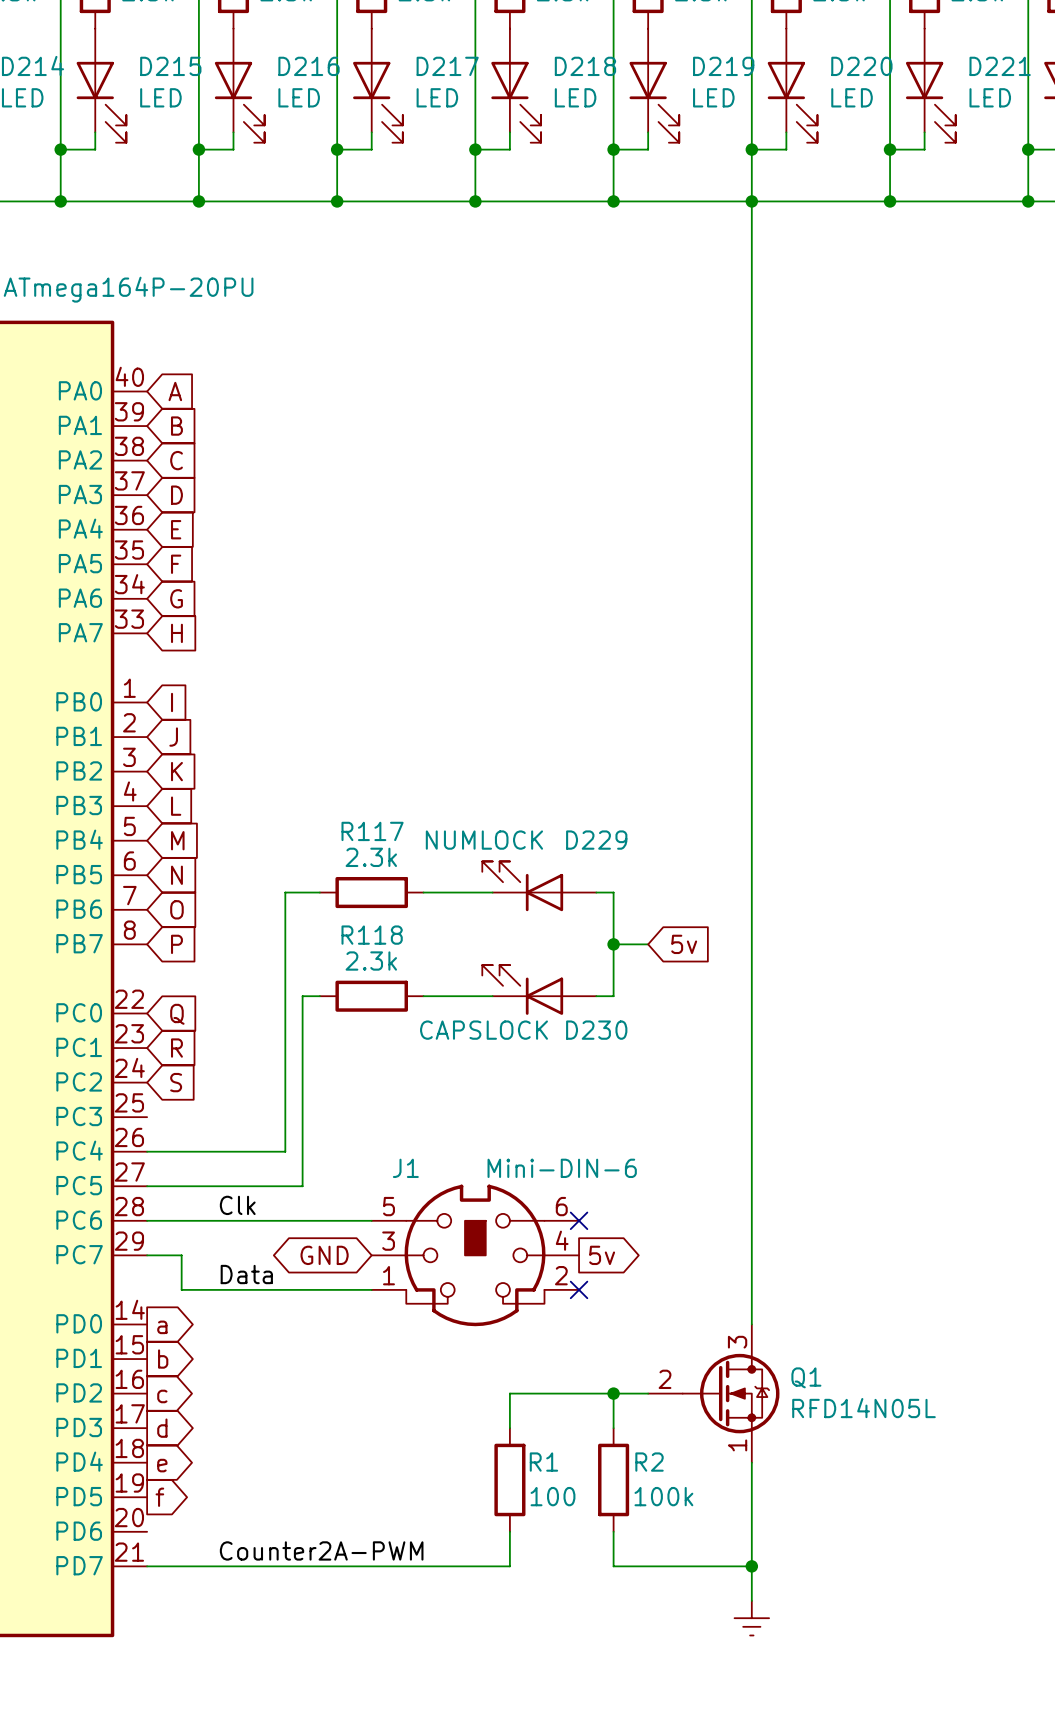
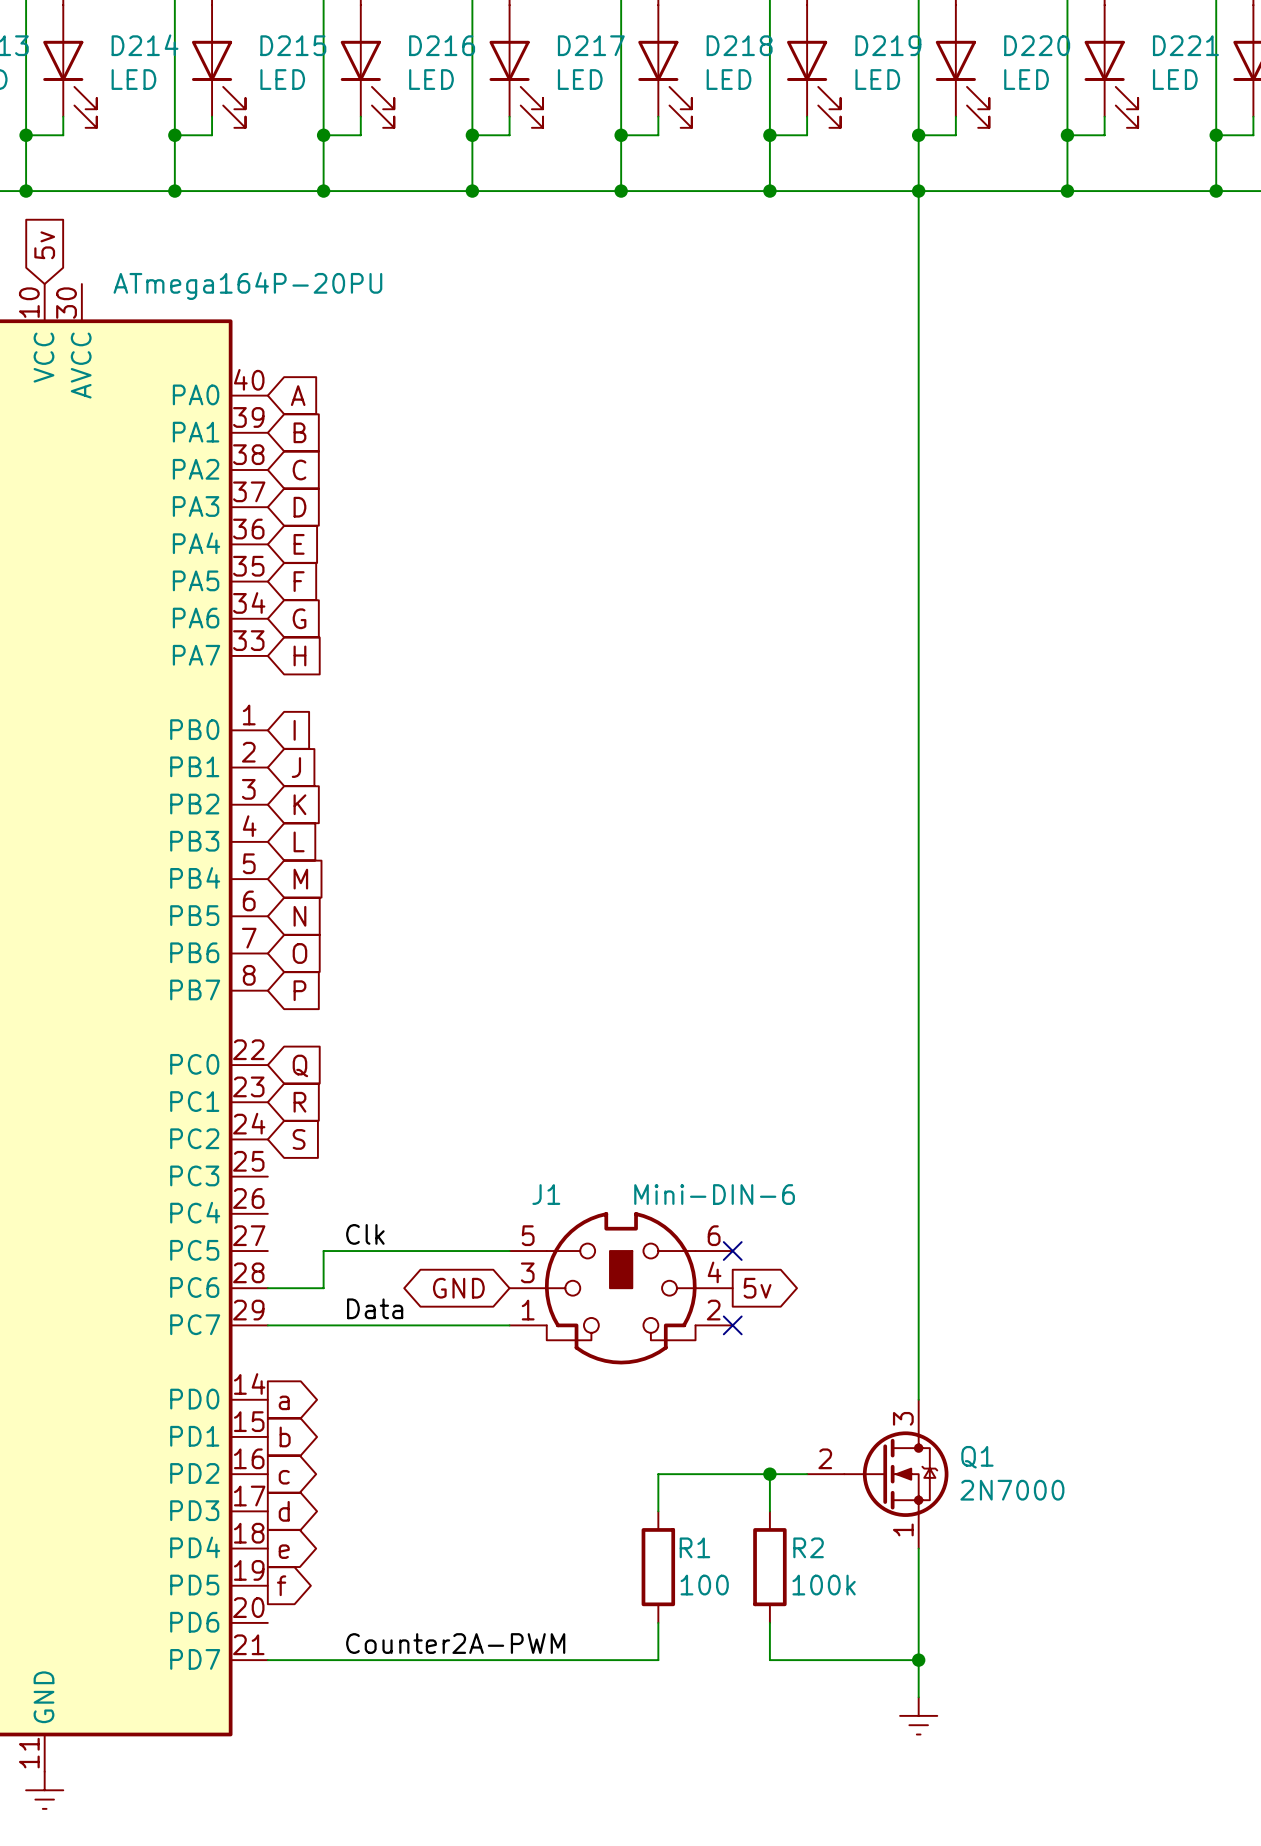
D229: NUMLOCK (539, 886) -> none
wire: (319, 892) (285, 892) (285, 1151) (147, 1151) -> none
R117: 2.3k (371, 892) -> none
wire: (423, 892) (492, 892) -> none
wire: (596, 892) (613, 892) (613, 996) (596, 996) -> none
wire: (613, 944) (648, 944) -> none
junction: (613, 944) -> none
global label: 5v (684, 944) -> none
D230: CAPSLOCK (539, 989) -> none
wire: (319, 996) (302, 996) (302, 1186) -> (509, 1251) (435, 1251)
R118: 2.3k (371, 996) -> none
wire: (423, 996) (492, 996) -> none
wire: (147, 1186) (198, 1186) -> (323, 1288) (323, 1251)
no-connect mark: none -> (732, 1251)
label position: Clk (237, 1205) -> Clk (365, 1234)
wire: (198, 1220) (371, 1220) -> none
no-connect mark: (579, 1220) -> none
wire: (181, 1255) (181, 1289) (371, 1289) -> (305, 1325) (509, 1325)
global label position: GND (324, 1255) -> GND (458, 1288)
J1 position: (475, 1255) -> (621, 1288)
no-connect mark: none -> (732, 1325)
global label position: 5v (602, 1255) -> 5v (757, 1288)
label position: Data (246, 1274) -> Data (375, 1308)
no-connect mark: (579, 1289) -> none
Q1 value: RFD14N05L (863, 1408) -> 2N7000 (1012, 1490)

